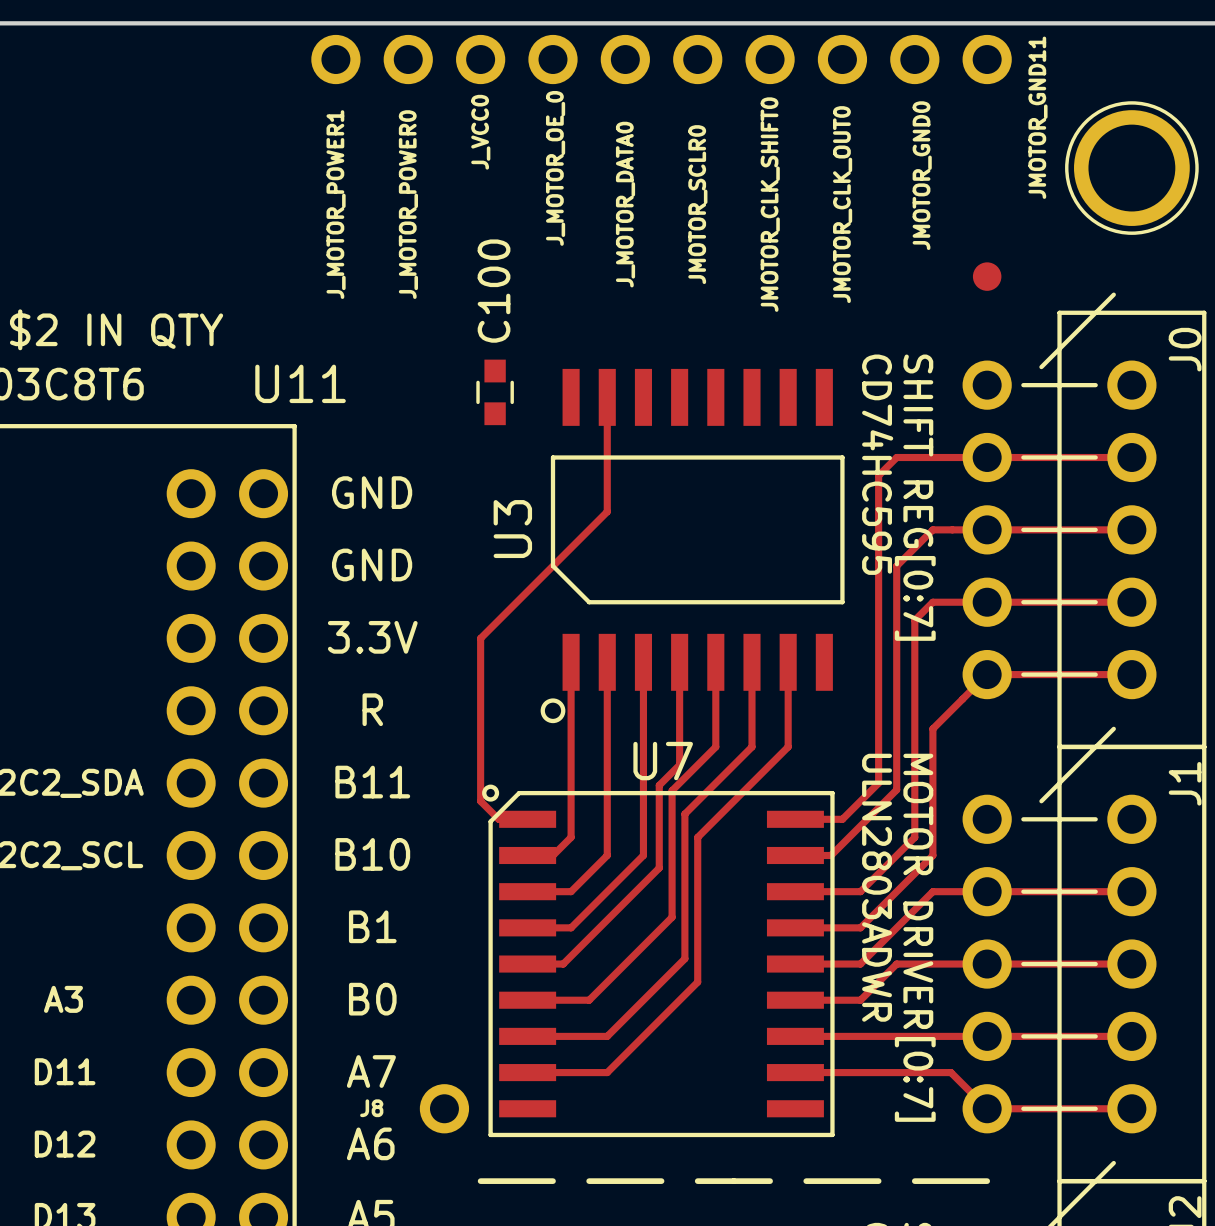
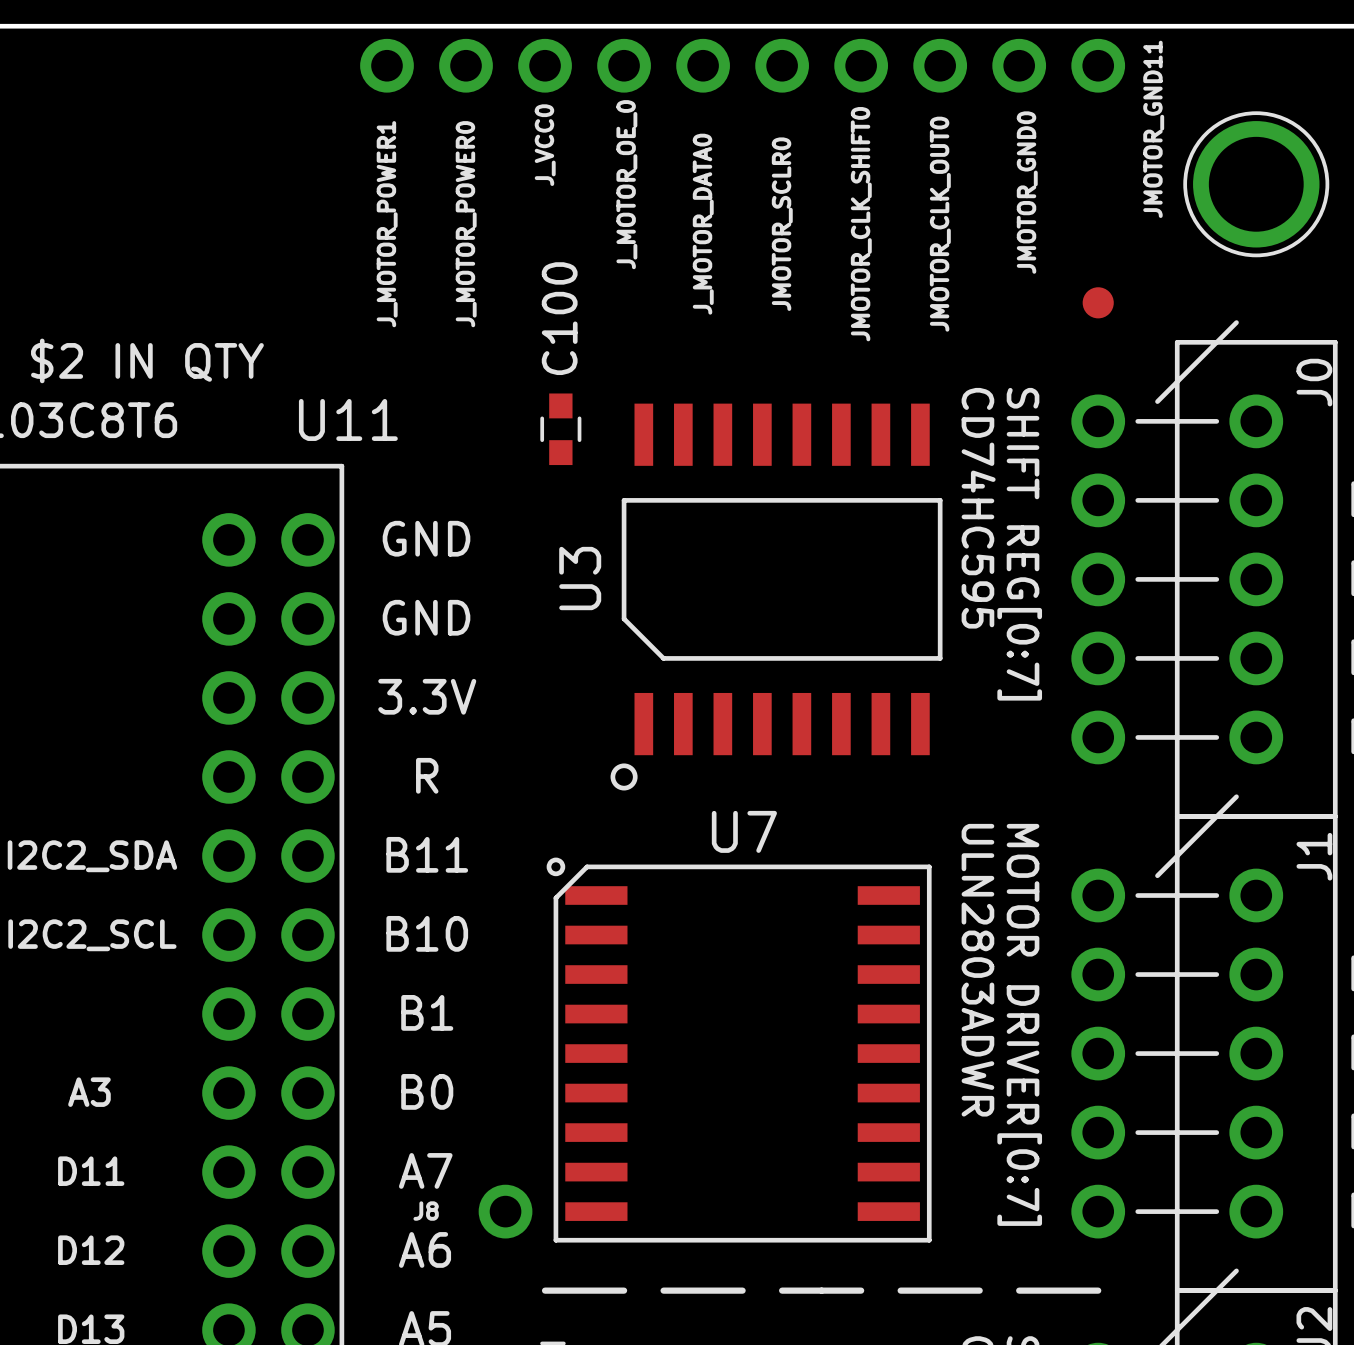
top track: (607, 397) (607, 511) (480, 638) (480, 801) (498, 819) (527, 819) -> none
top track: (1131, 457) (896, 457) (878, 475) (878, 783) (842, 819) (795, 819) -> none
top track: (1131, 529) (932, 529) (896, 566) (896, 789) (831, 855) (795, 855) -> none
top track: (1131, 602) (932, 602) (914, 620) (914, 837) (860, 891) (795, 891) -> none
top track: (571, 662) (571, 837) (553, 855) (527, 855) -> none
top track: (607, 662) (607, 855) (571, 891) (527, 891) -> none
top track: (643, 662) (643, 855) (571, 927) (527, 927) -> none
top track: (679, 662) (679, 765) (659, 785) (659, 868) (563, 964) (527, 964) -> none
top track: (715, 662) (715, 746) (672, 790) (672, 917) (589, 1000) (527, 1000) -> none
top track: (751, 662) (751, 746) (684, 814) (684, 958) (607, 1036) (527, 1036) -> none
top track: (788, 662) (788, 746) (697, 837) (697, 982) (607, 1072) (527, 1072) -> none
top track: (1131, 674) (987, 674) (932, 728) (932, 855) (860, 927) (795, 927) -> none
top track: (1131, 891) (932, 891) (860, 964) (795, 964) -> none
top track: (1131, 964) (896, 964) (860, 1000) (795, 1000) -> none
top track: (795, 1036) (1131, 1036) -> none
top track: (795, 1072) (950, 1072) (987, 1108) (1131, 1108) -> none

